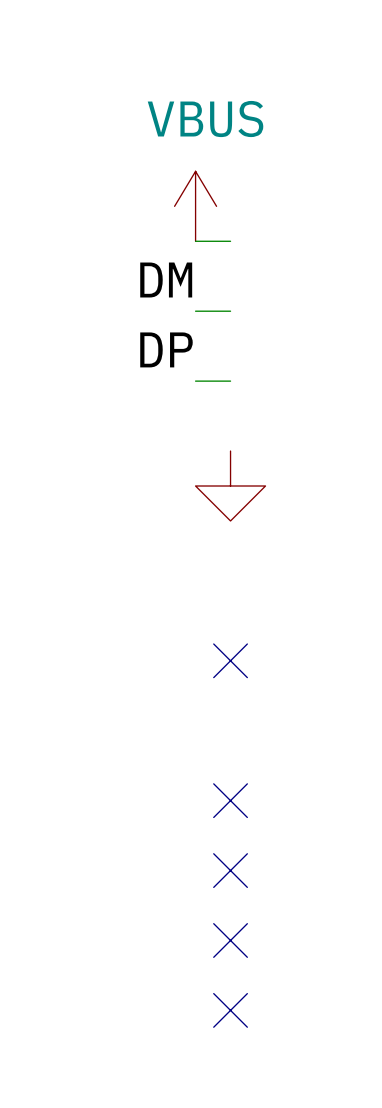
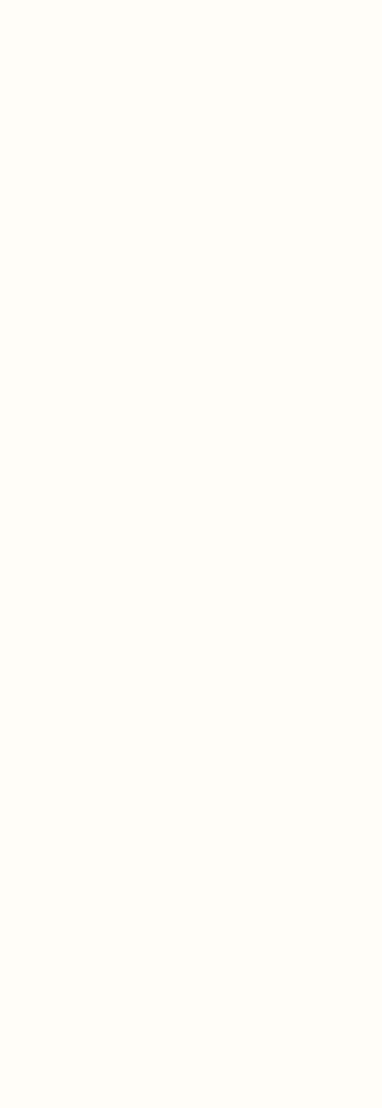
power symbol: VBUS (195, 206) -> none
wire: (195, 241) (230, 241) -> none
label: DM (166, 280) -> none
wire: (195, 311) (230, 311) -> none
label: DP (166, 349) -> none
wire: (195, 381) (230, 381) -> none
power symbol: (230, 486) -> none
no-connect mark: (230, 660) -> none
no-connect mark: (230, 800) -> none
no-connect mark: (230, 870) -> none
no-connect mark: (230, 940) -> none
no-connect mark: (230, 1010) -> none

